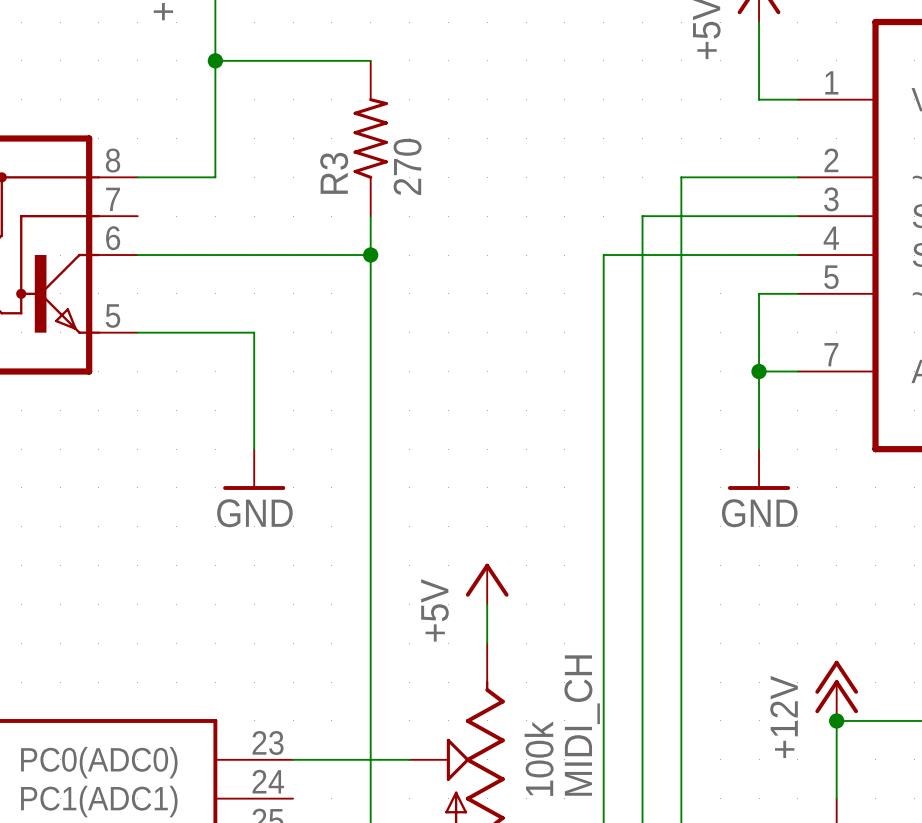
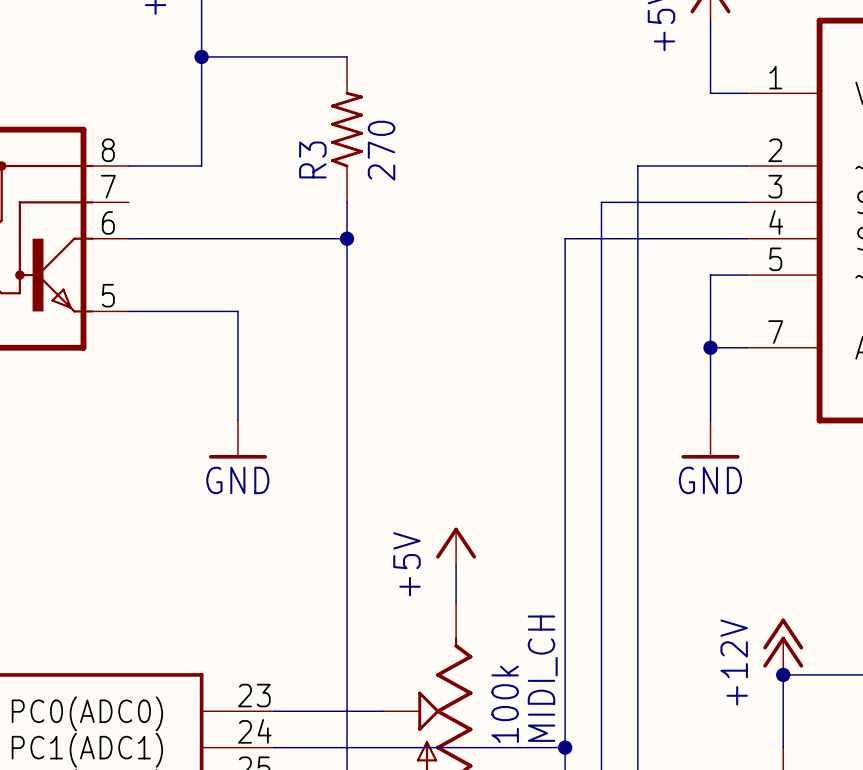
wire: none -> (274, 747) (565, 747)
junction: none -> (565, 747)

